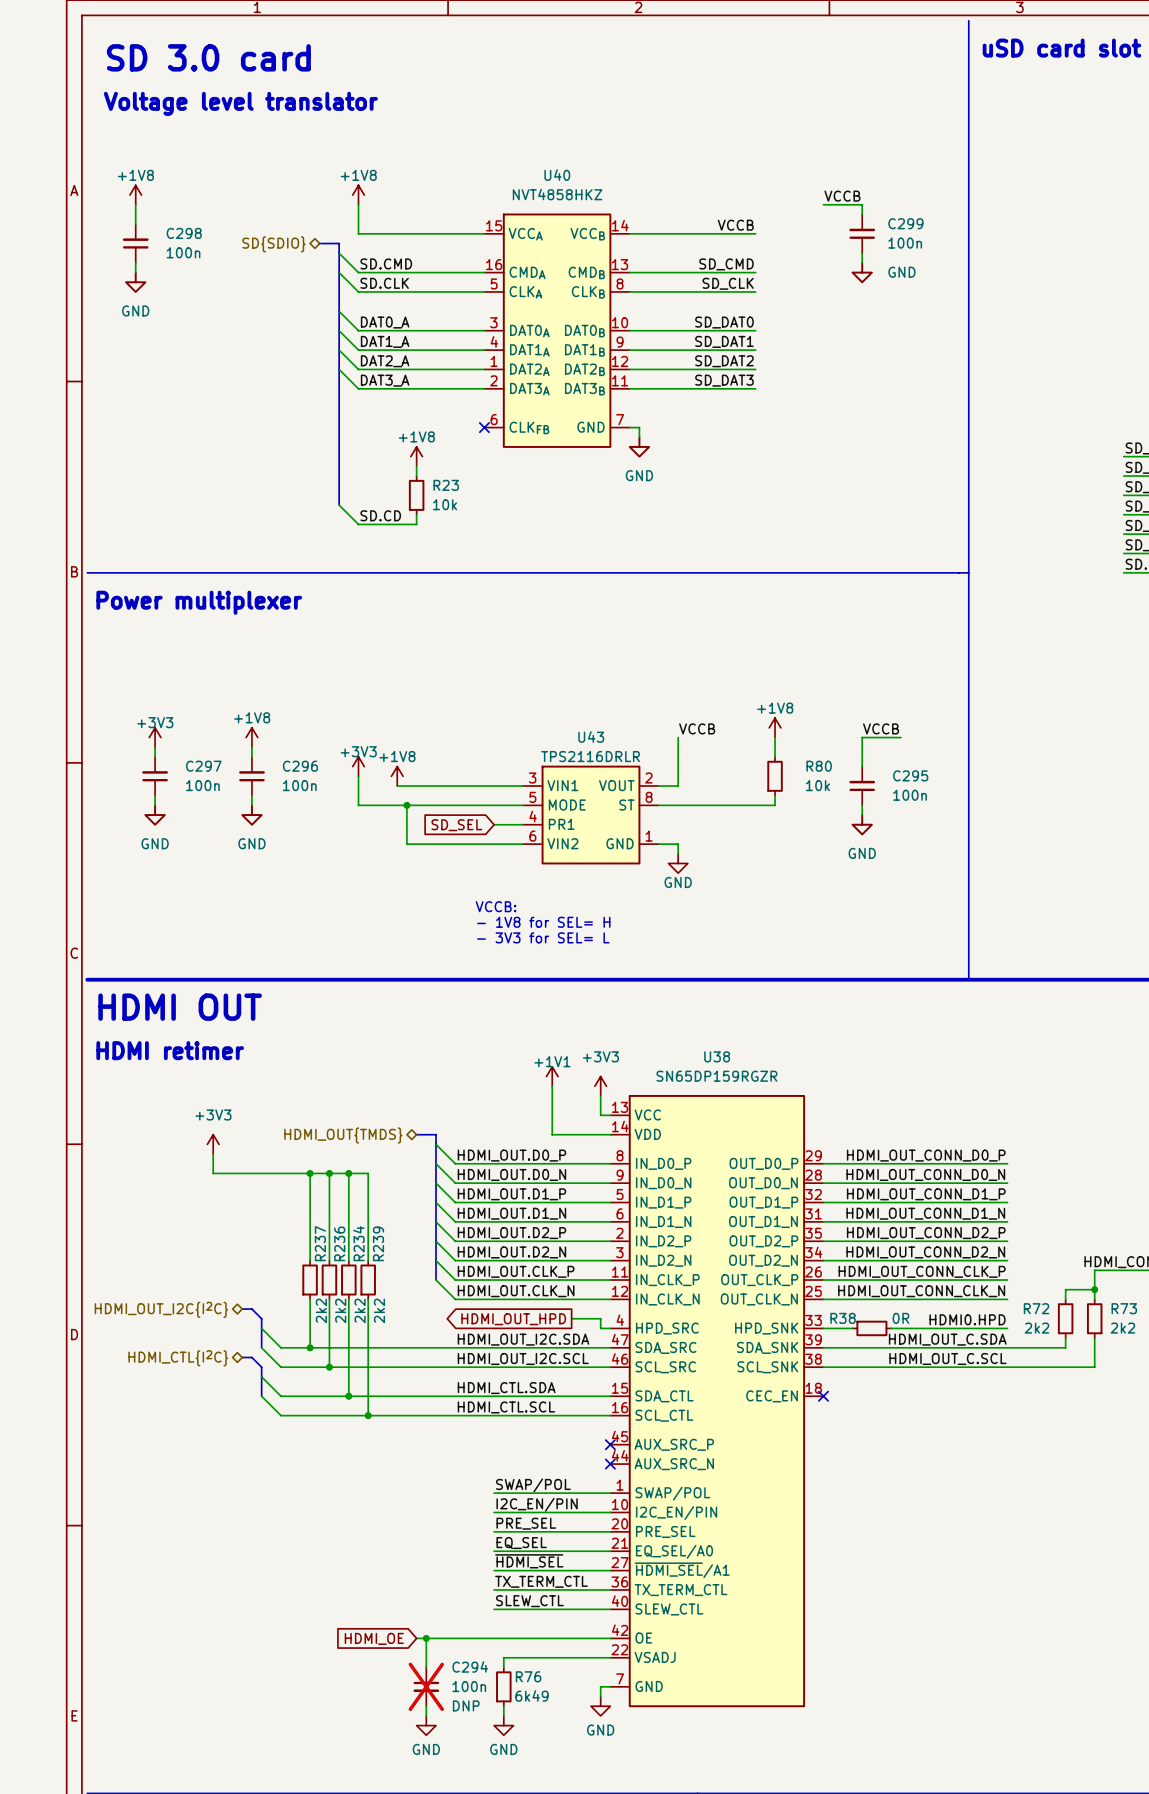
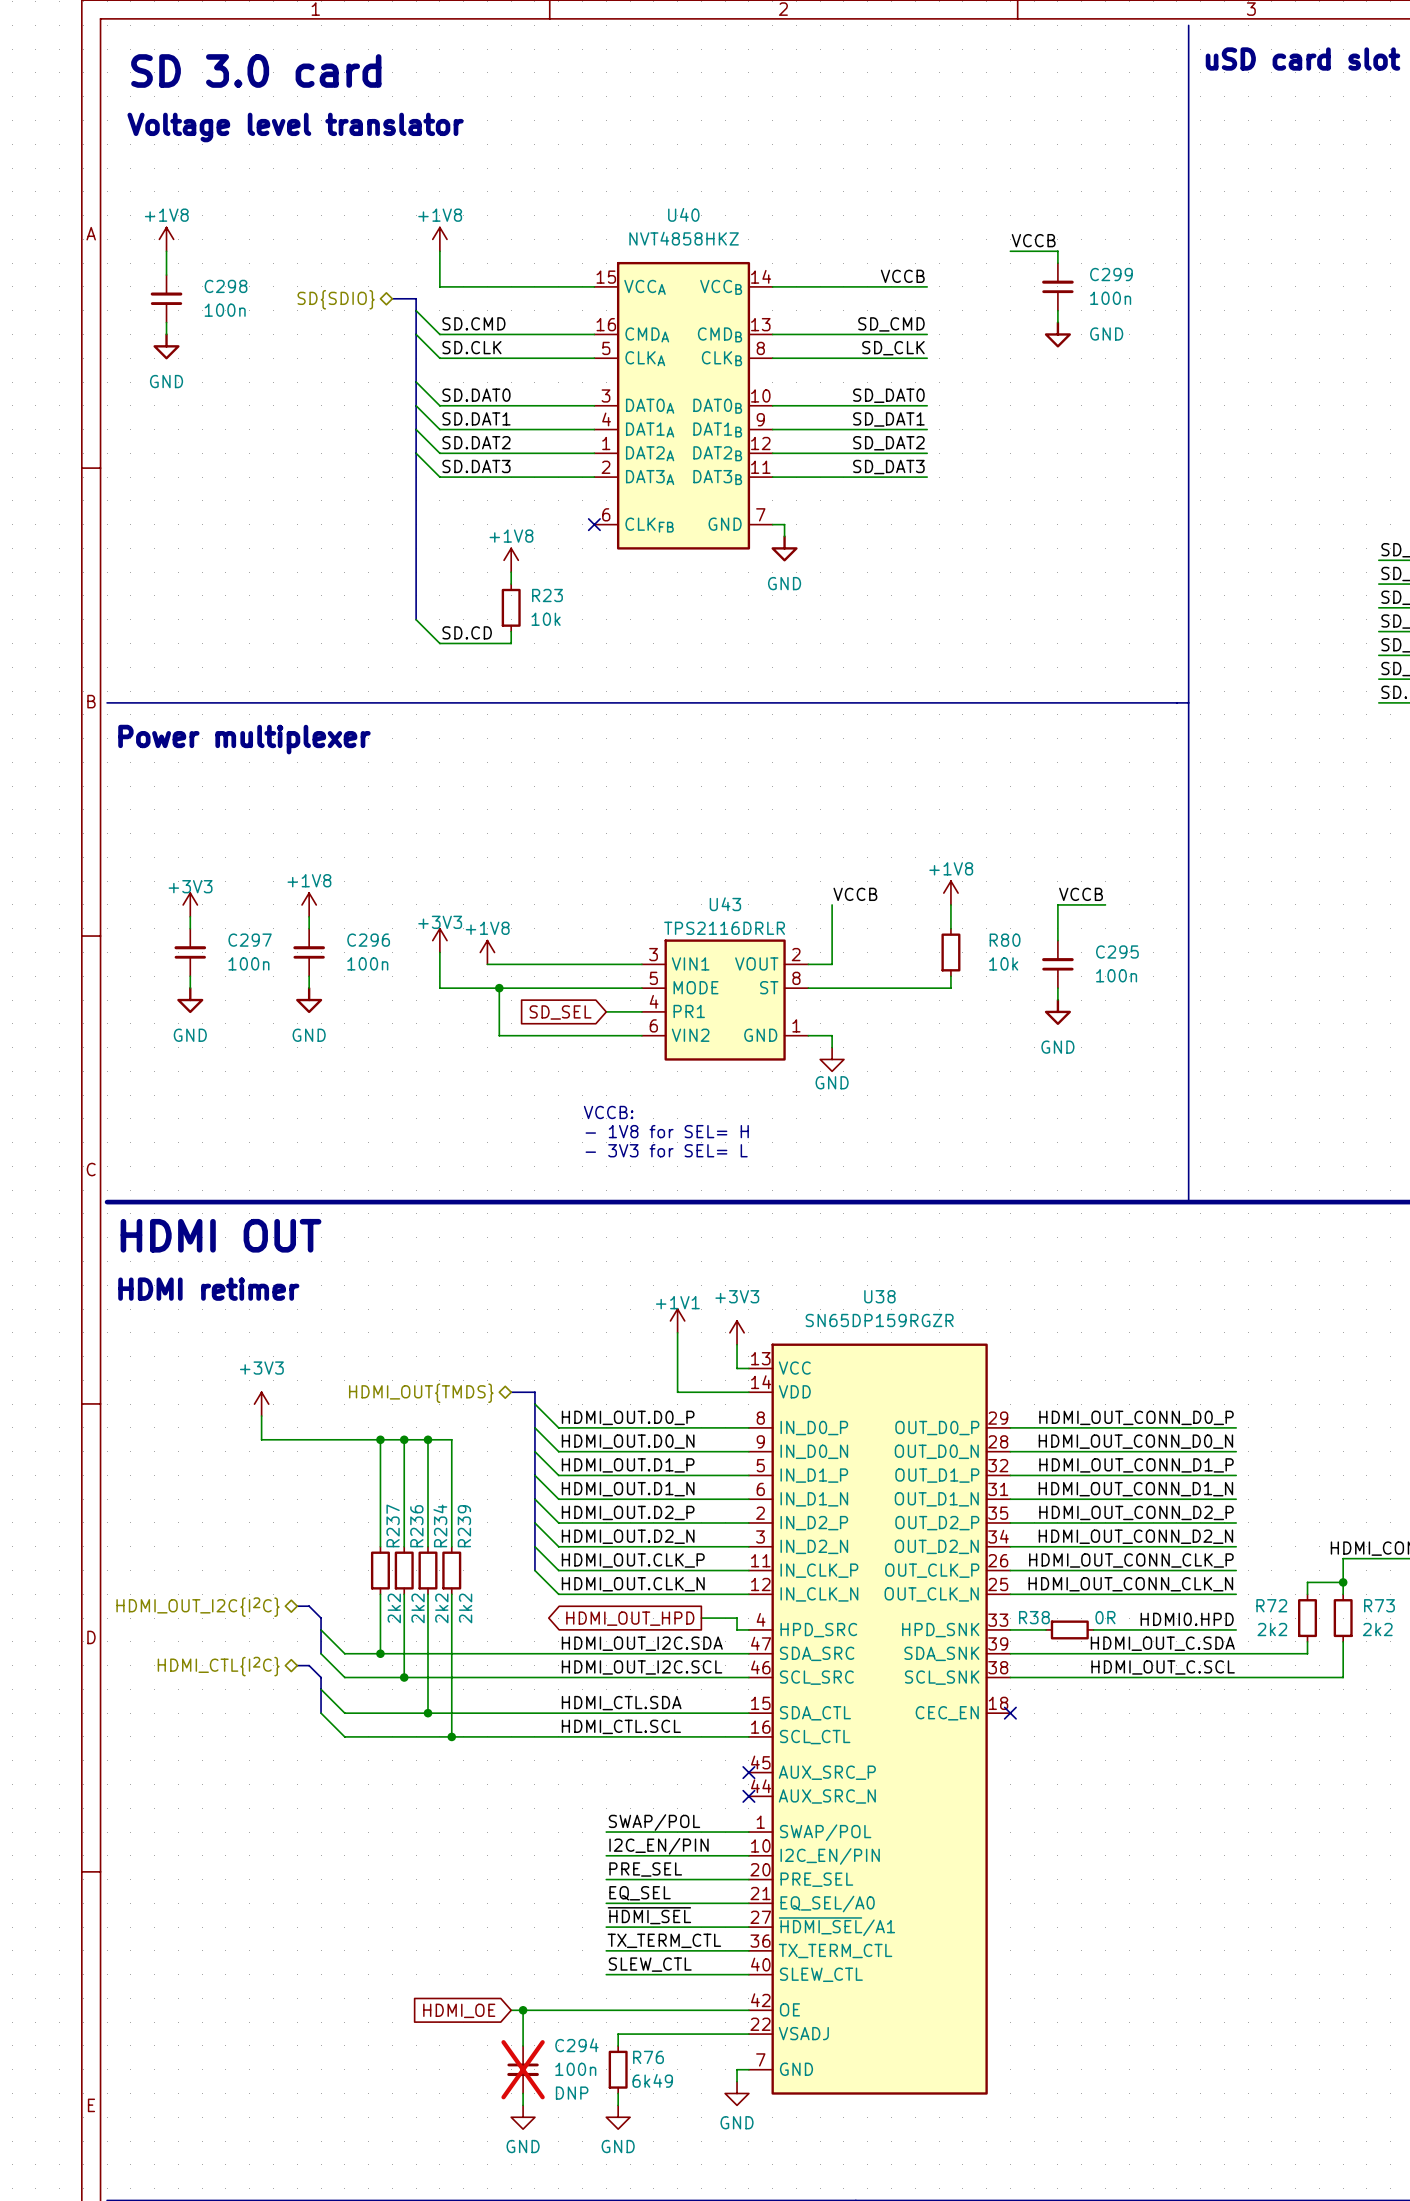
label: DAT0_A (385, 322) -> SD.DAT0 (476, 395)
label: DAT1_A (385, 341) -> SD.DAT1 (476, 418)
label: DAT2_A (385, 361) -> SD.DAT2 (476, 442)
label: DAT3_A (385, 380) -> SD.DAT3 (476, 466)

